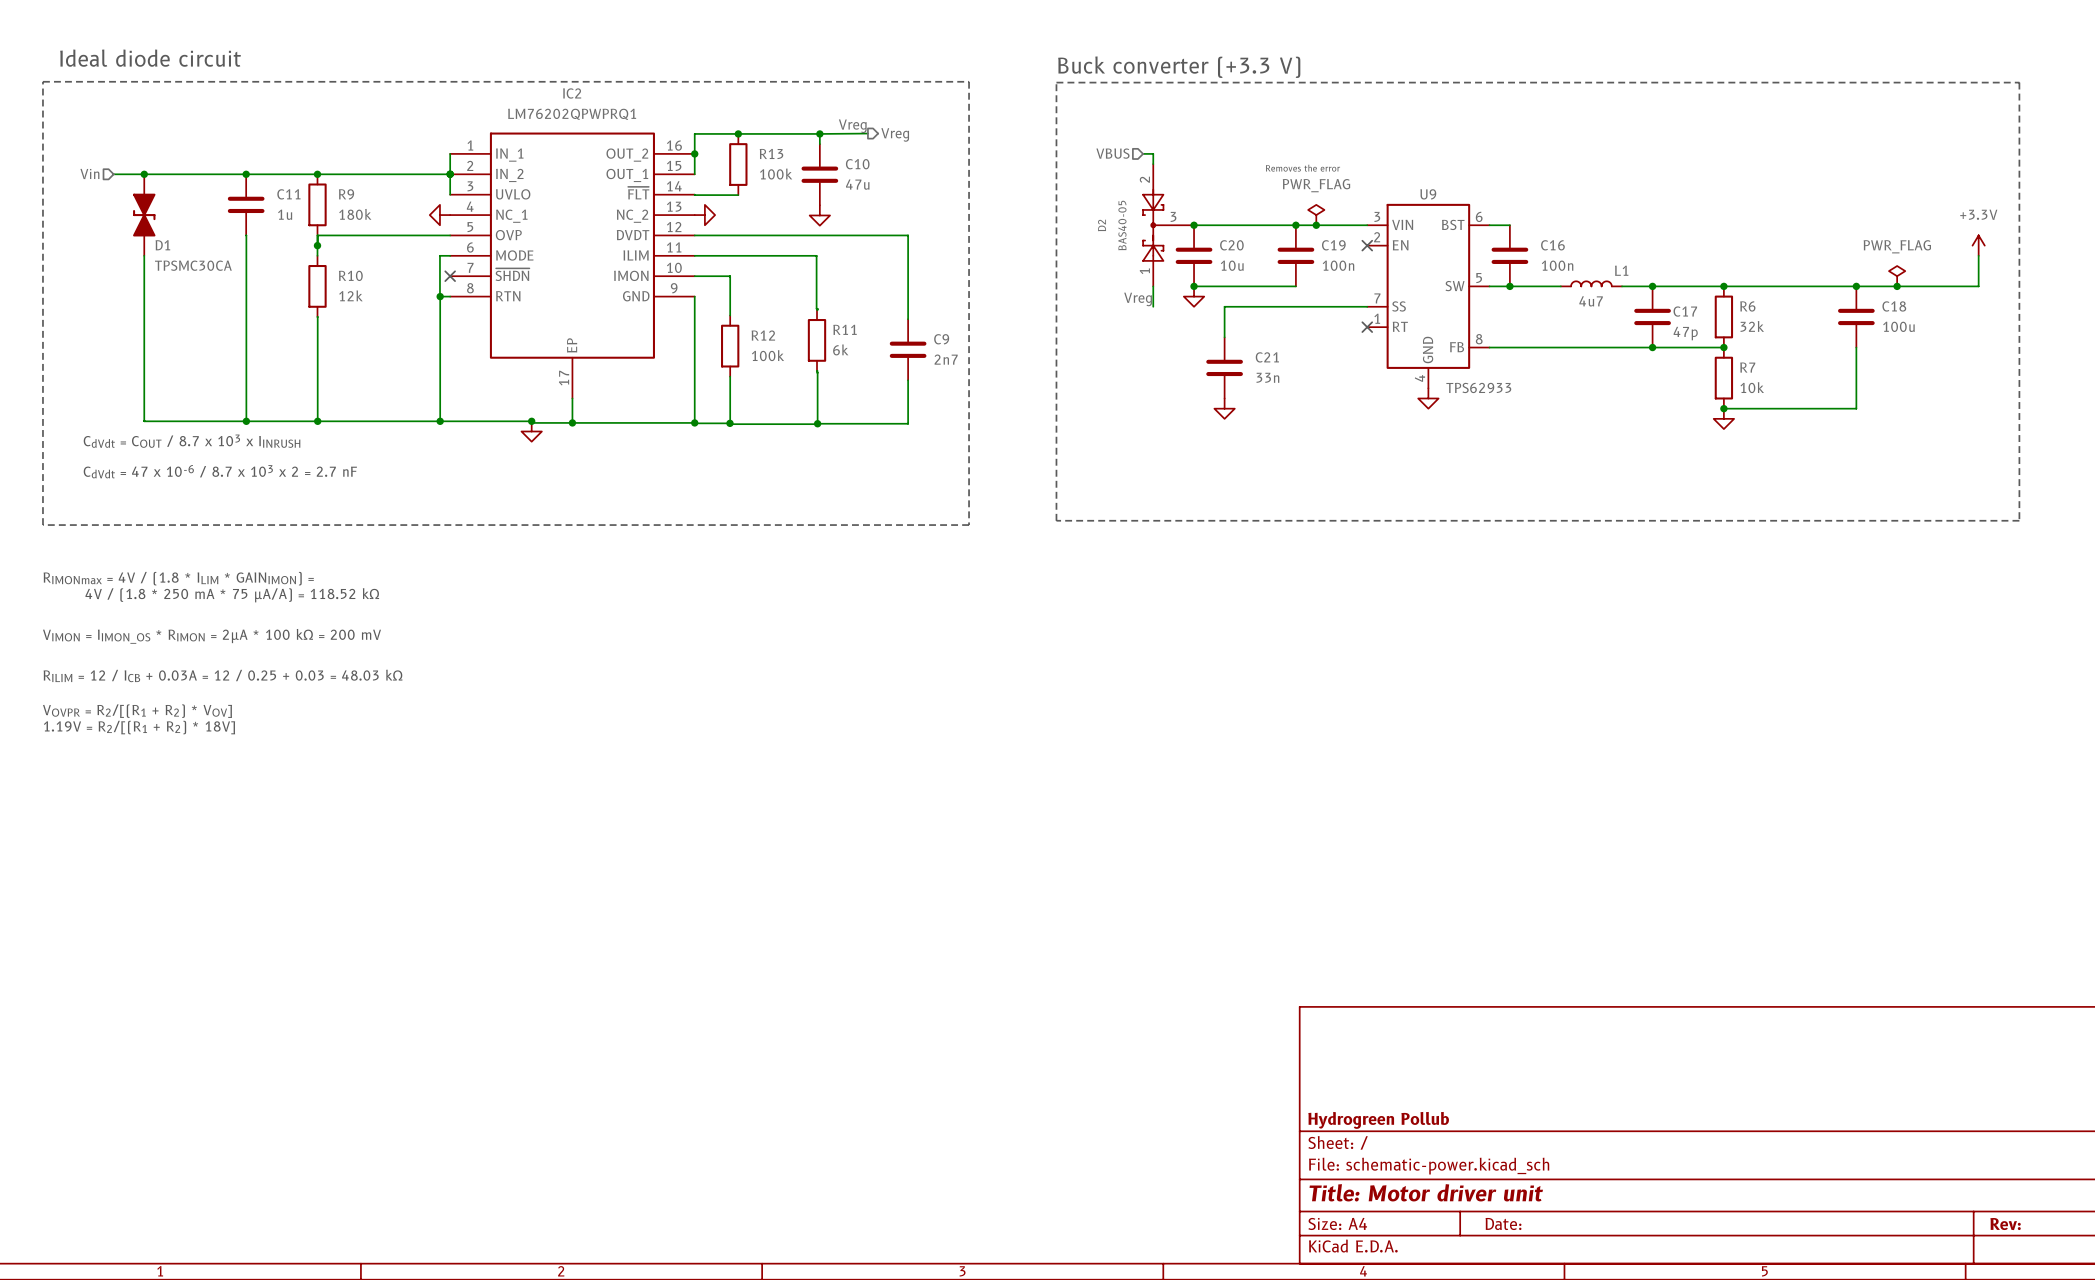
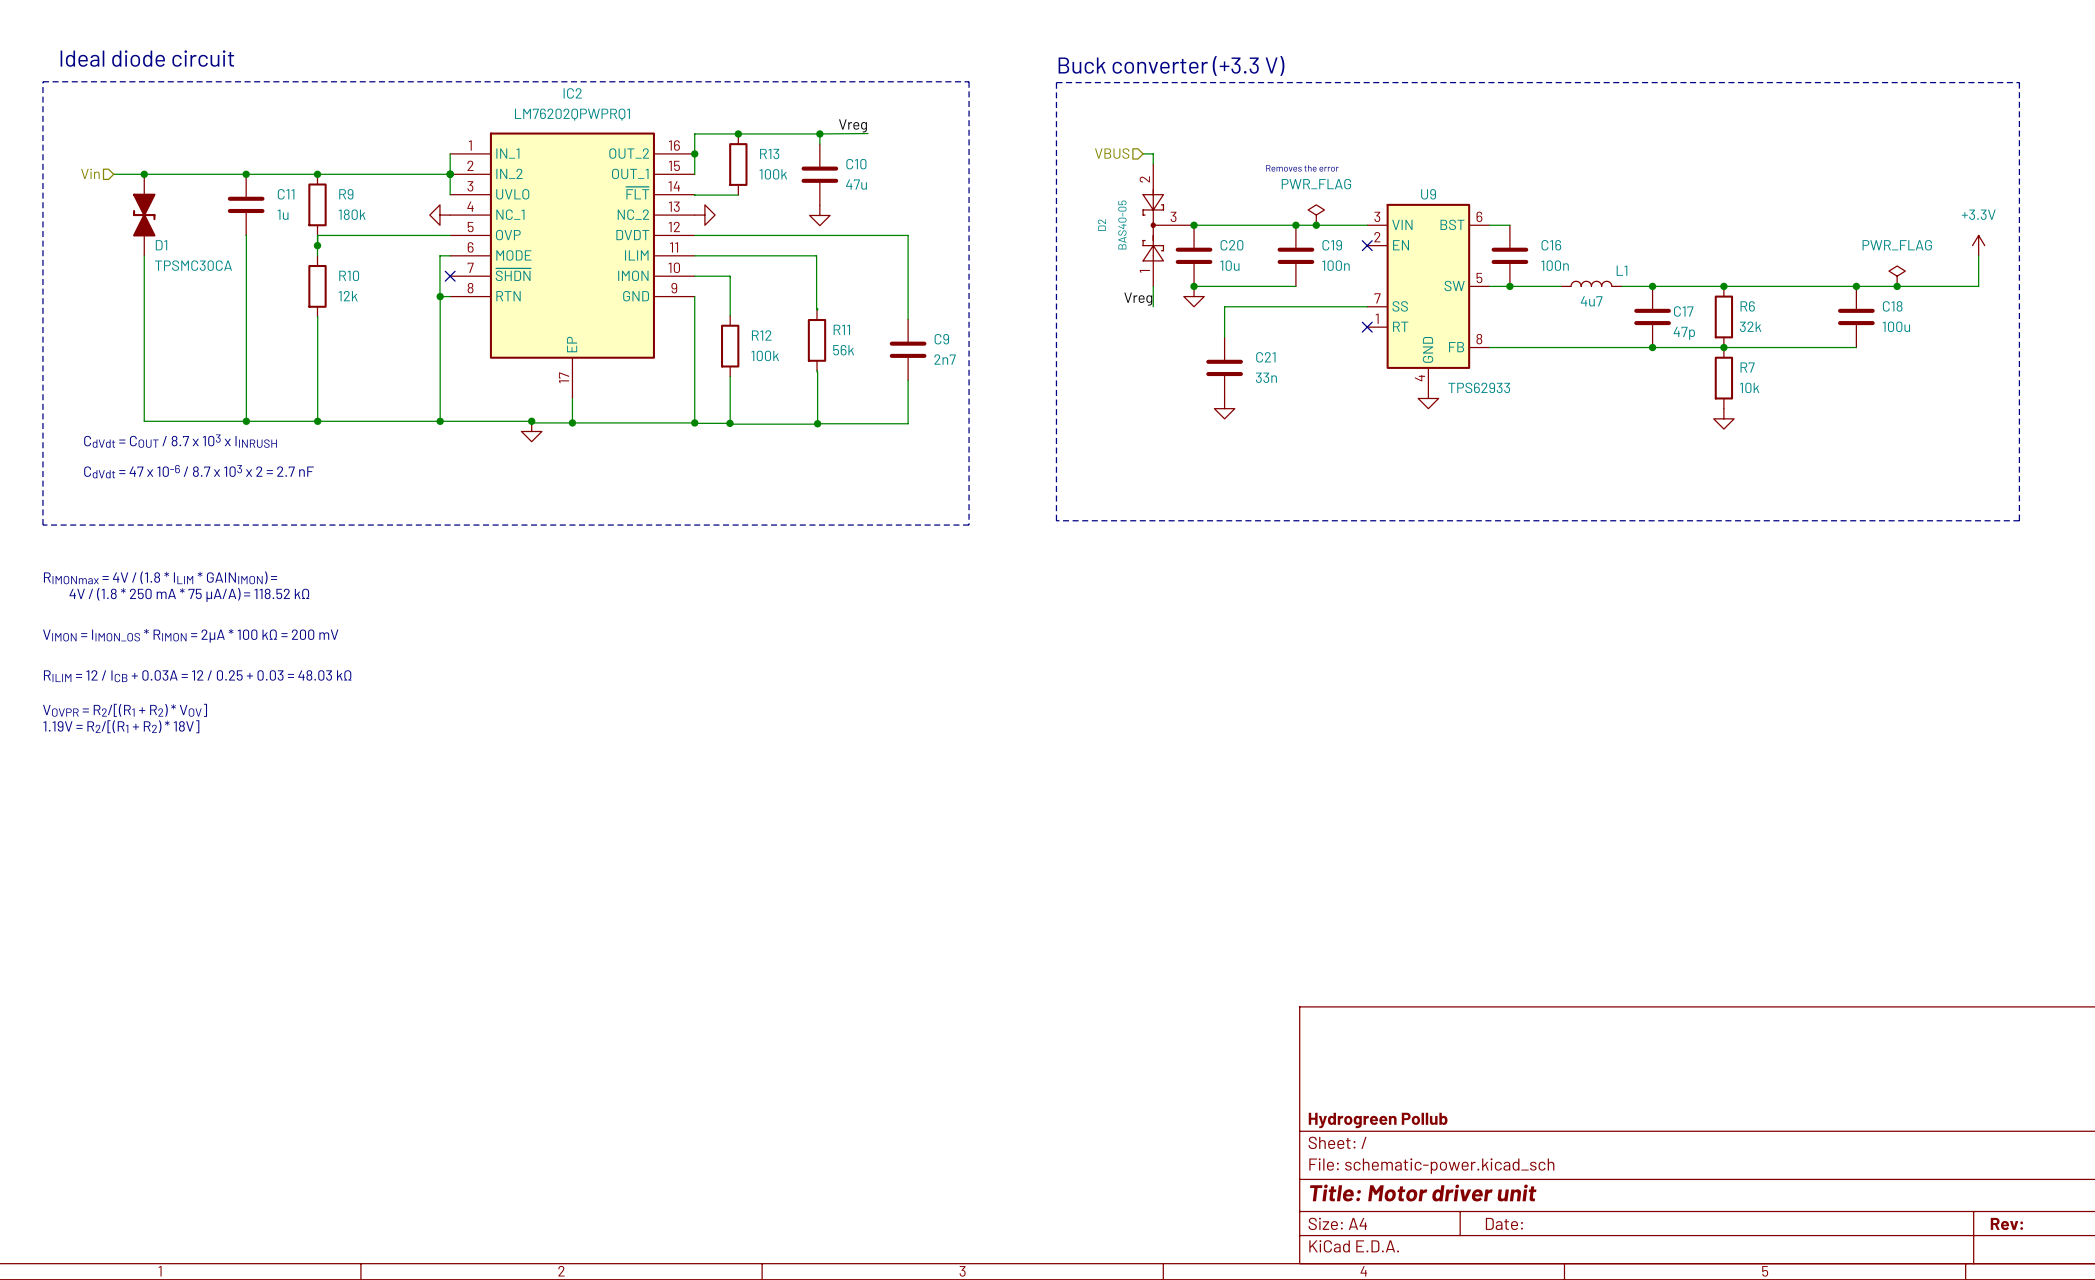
hierarchical label: Vreg (895, 134) -> none
wire: (1856, 347) (1856, 408) (1723, 408) -> (1856, 347) (1723, 347)
R11 value: 6k (840, 349) -> 56k (843, 350)
junction: (1723, 408) -> none

